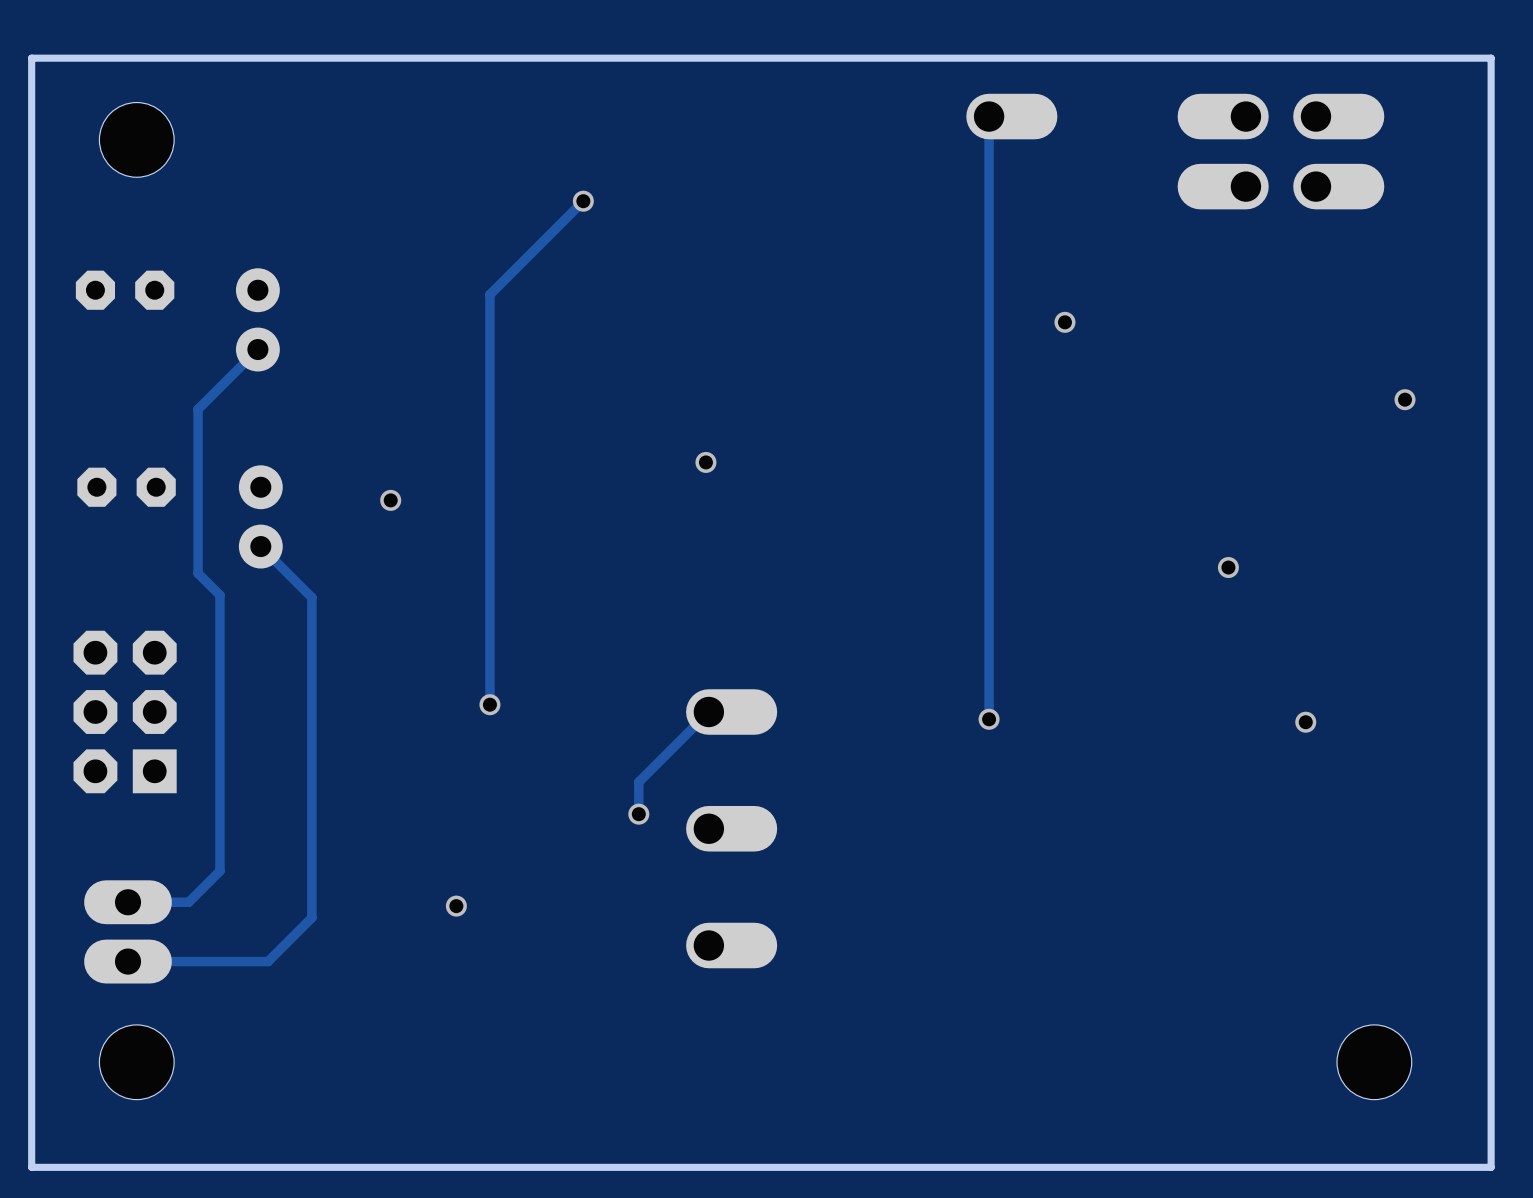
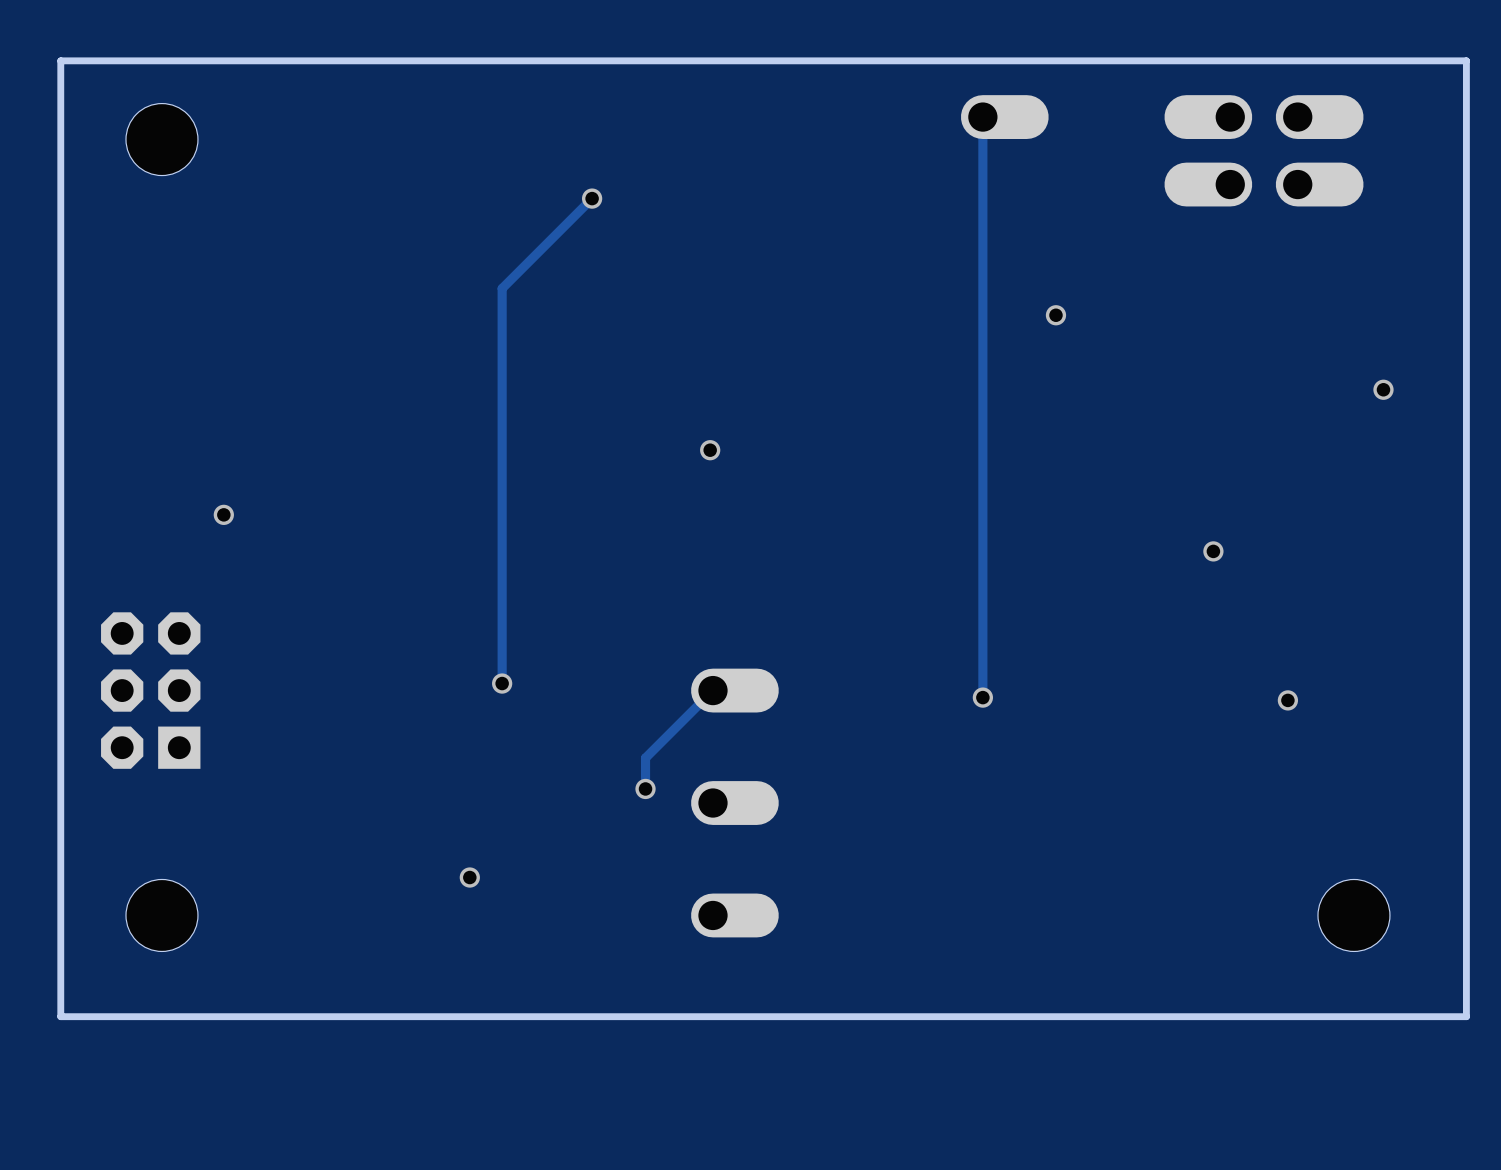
part: (125, 290) -> none
part: (257, 319) -> none
track: (257, 349) (198, 409) (198, 573) (219, 595) (219, 871) (188, 902) (128, 902) -> none
part: (126, 487) -> none
via: (390, 500) -> none
part: (260, 516) -> none
via: none -> (223, 514)
track: (260, 546) (311, 597) (311, 917) (268, 961) (128, 961) -> none
part: (128, 931) -> none
board edge: (1491, 1050) (1491, 1167) (31, 1167) (31, 1050) -> (1466, 1016) (60, 1016)
hole position: (136, 1062) -> (161, 915)
hole position: (1374, 1062) -> (1353, 915)

